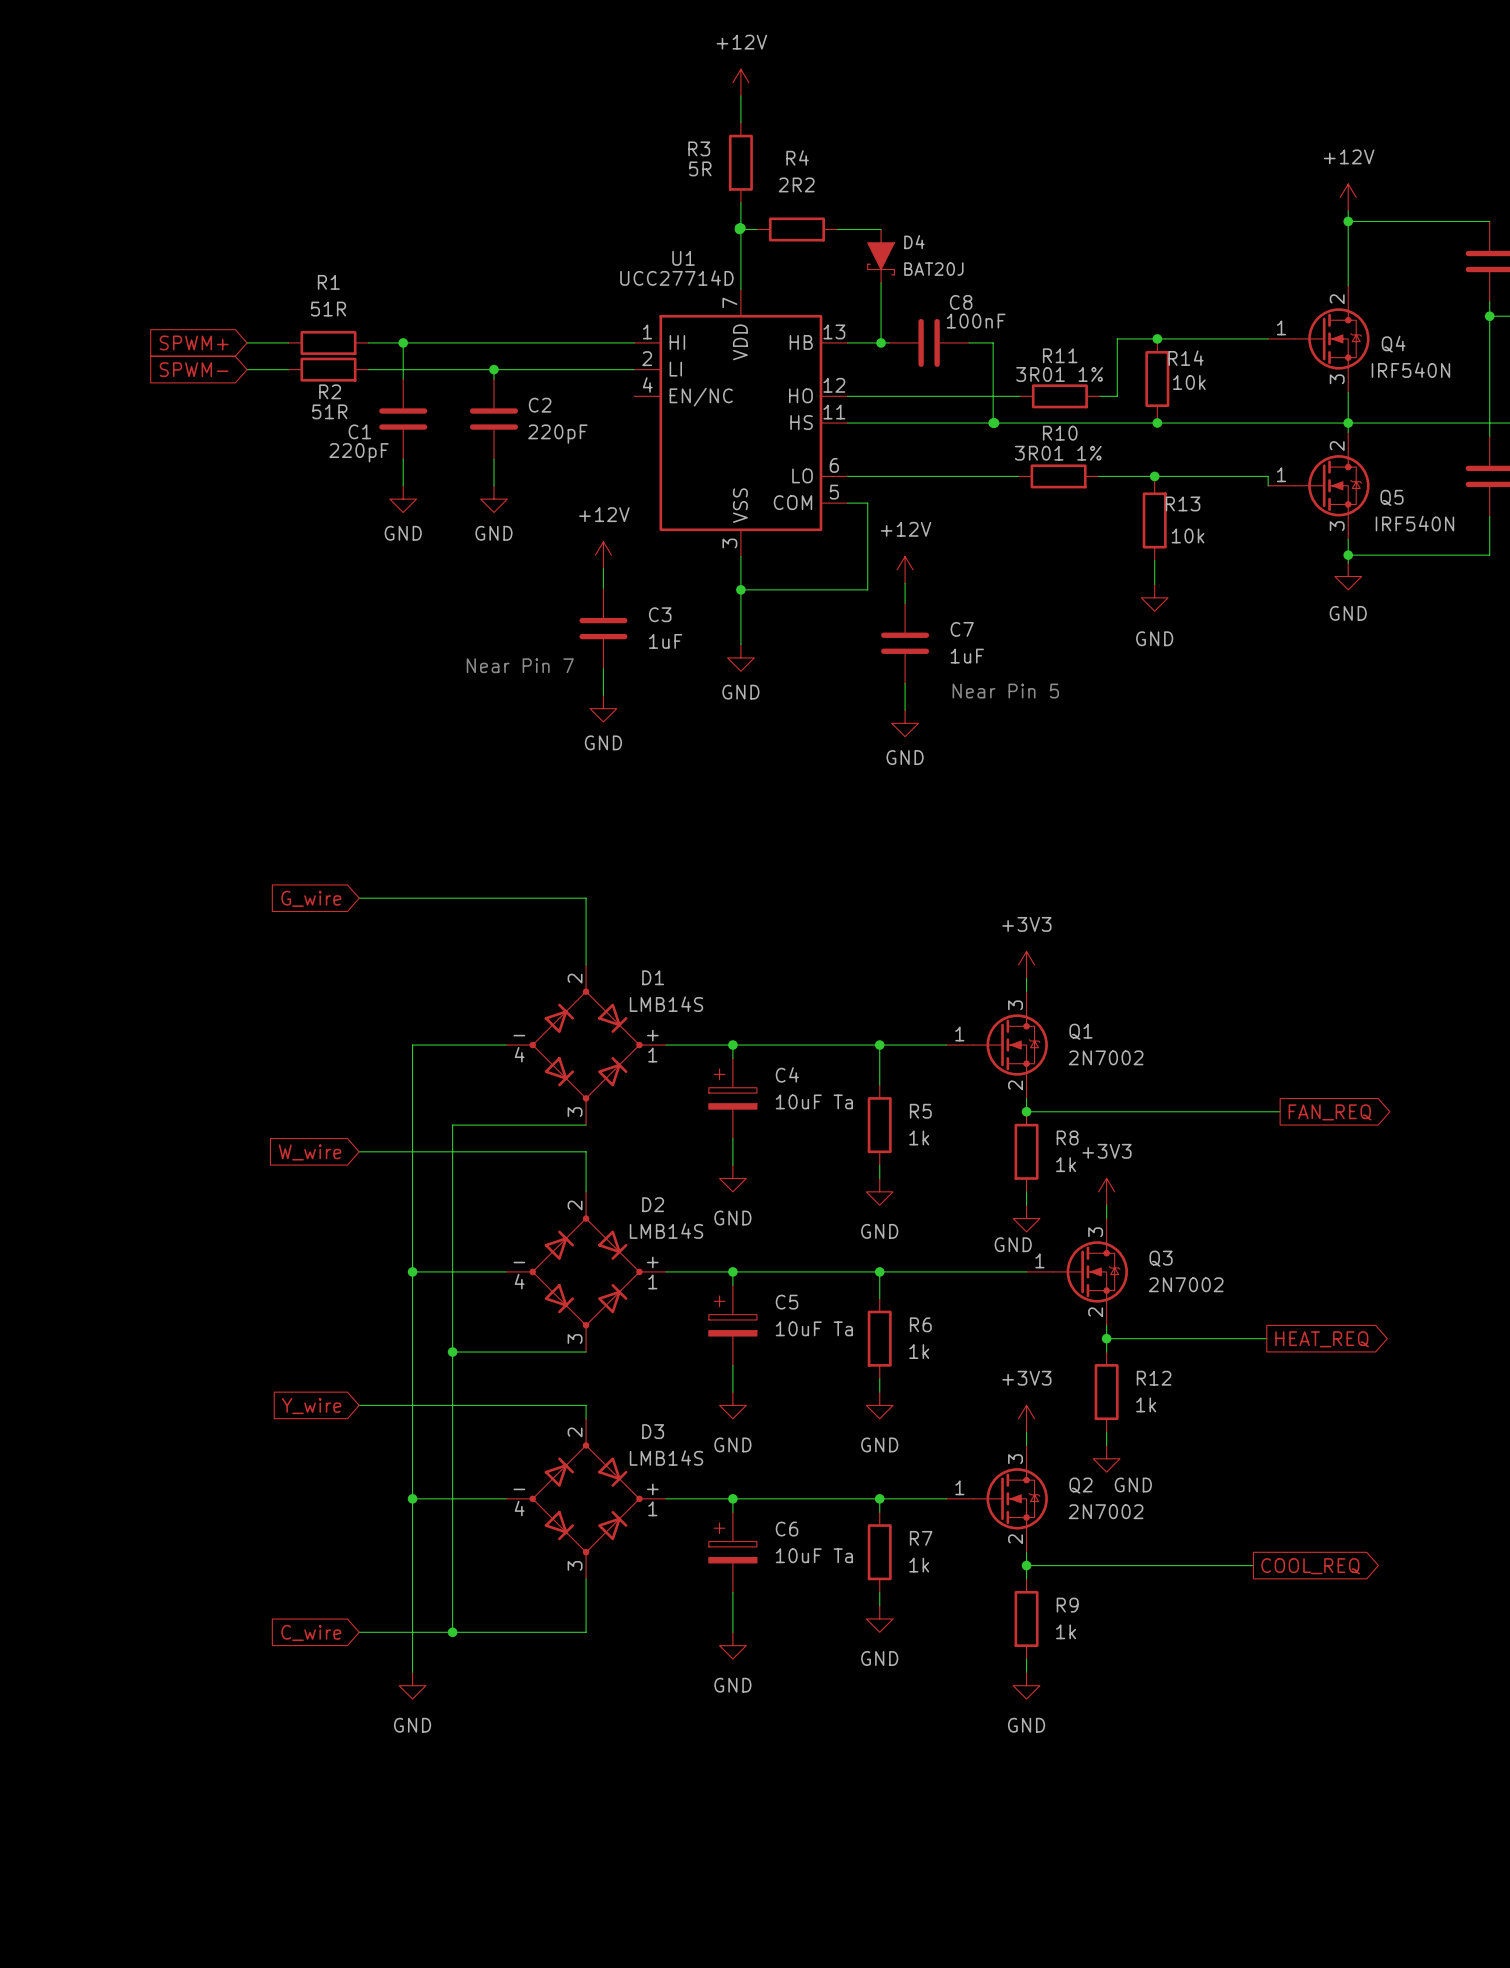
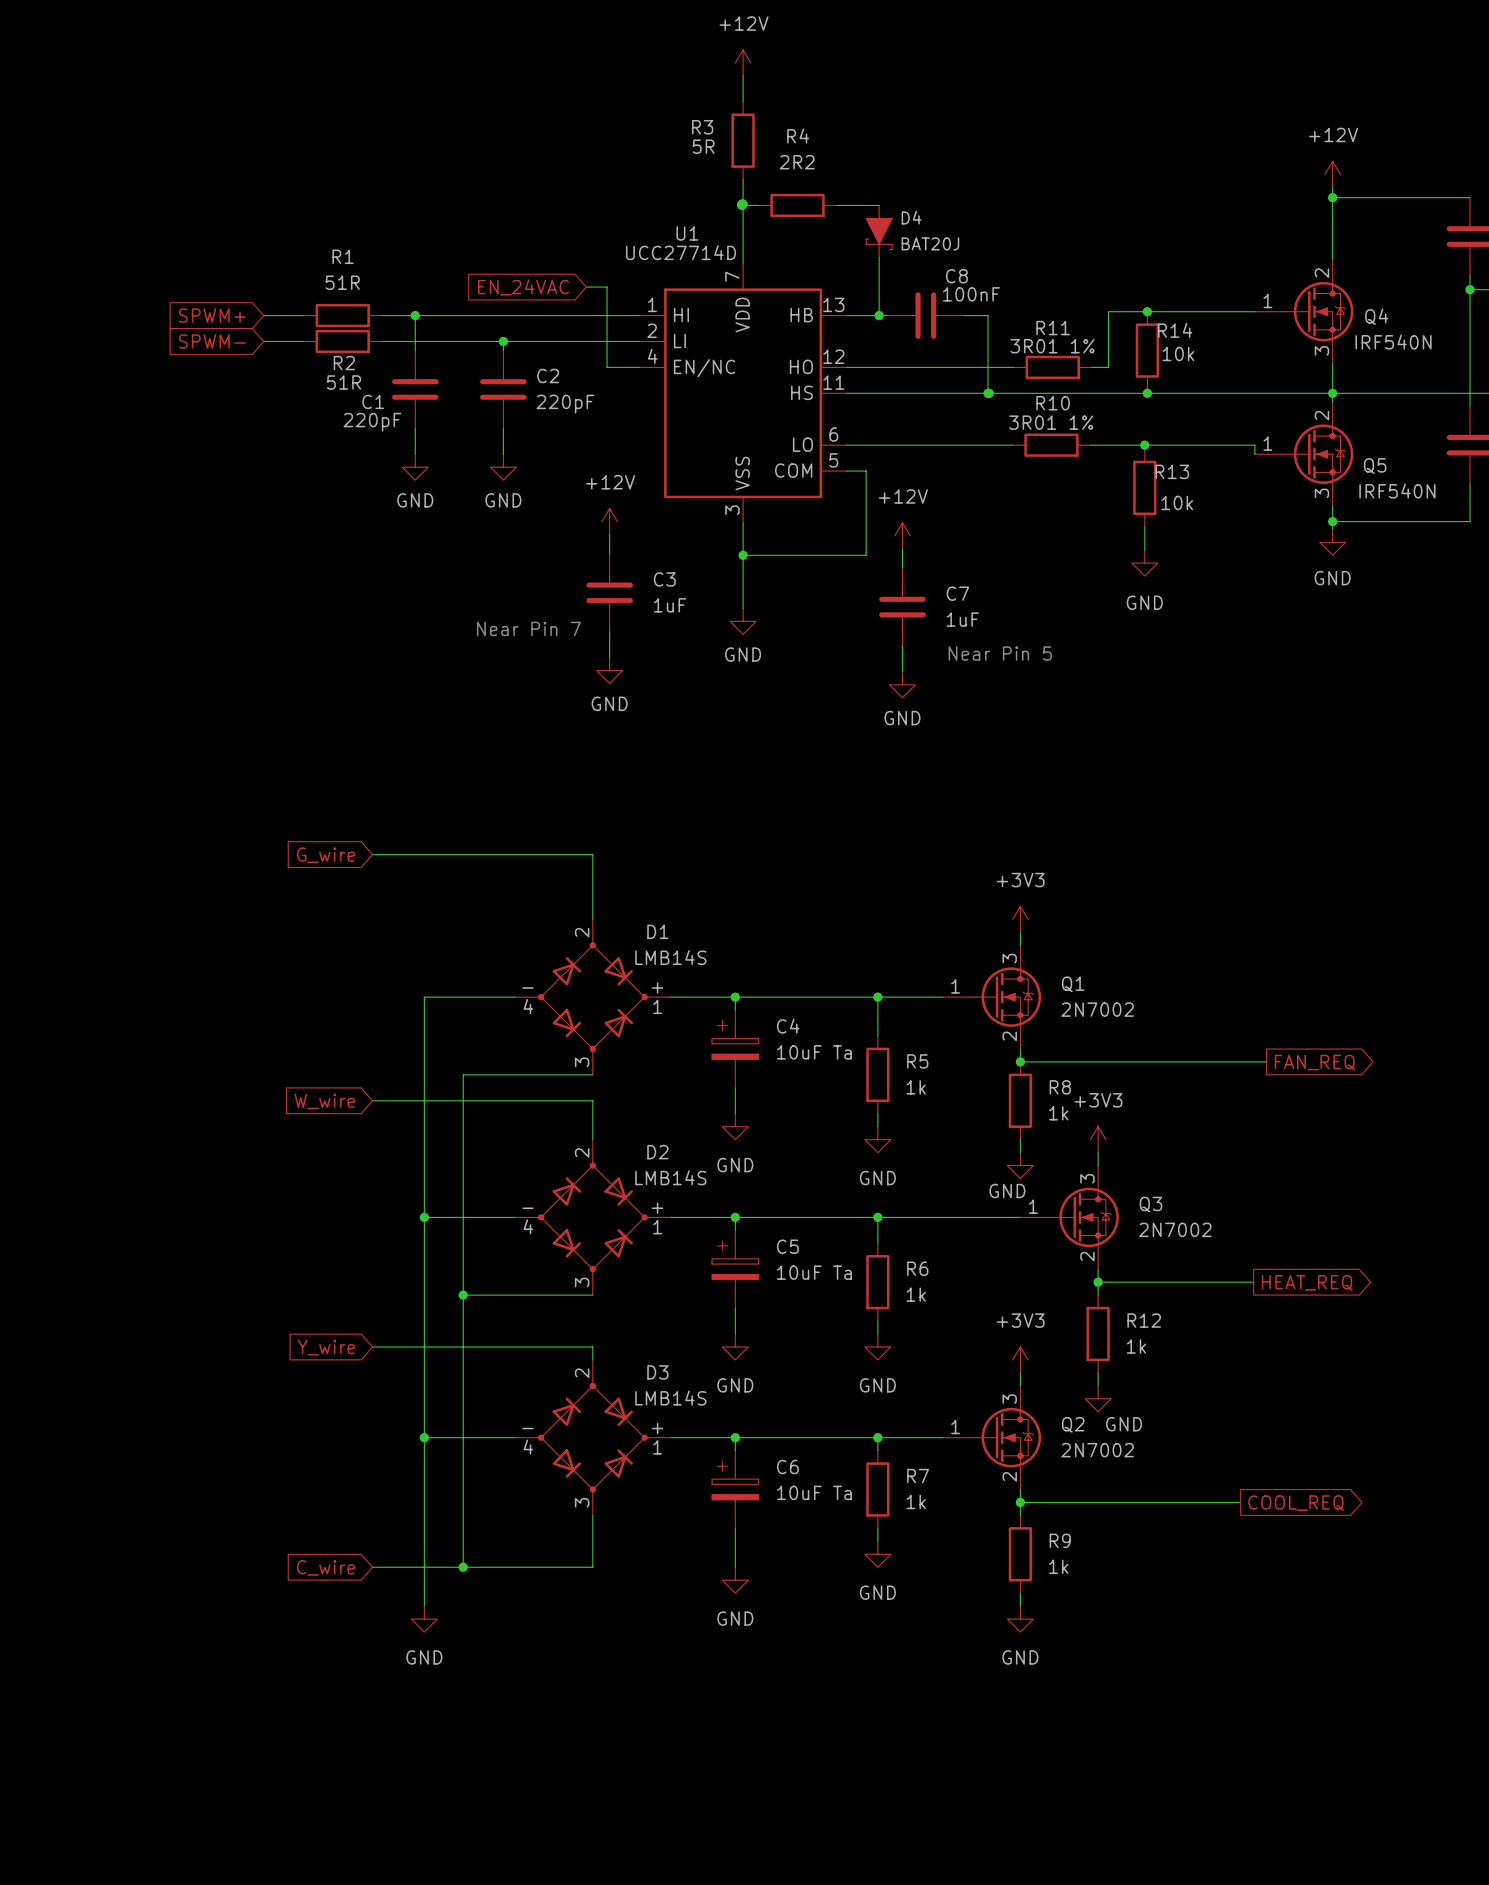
global label: none -> EN_24VAC (523, 287)
wire: none -> (586, 287) (607, 287) (607, 367) (639, 367)

